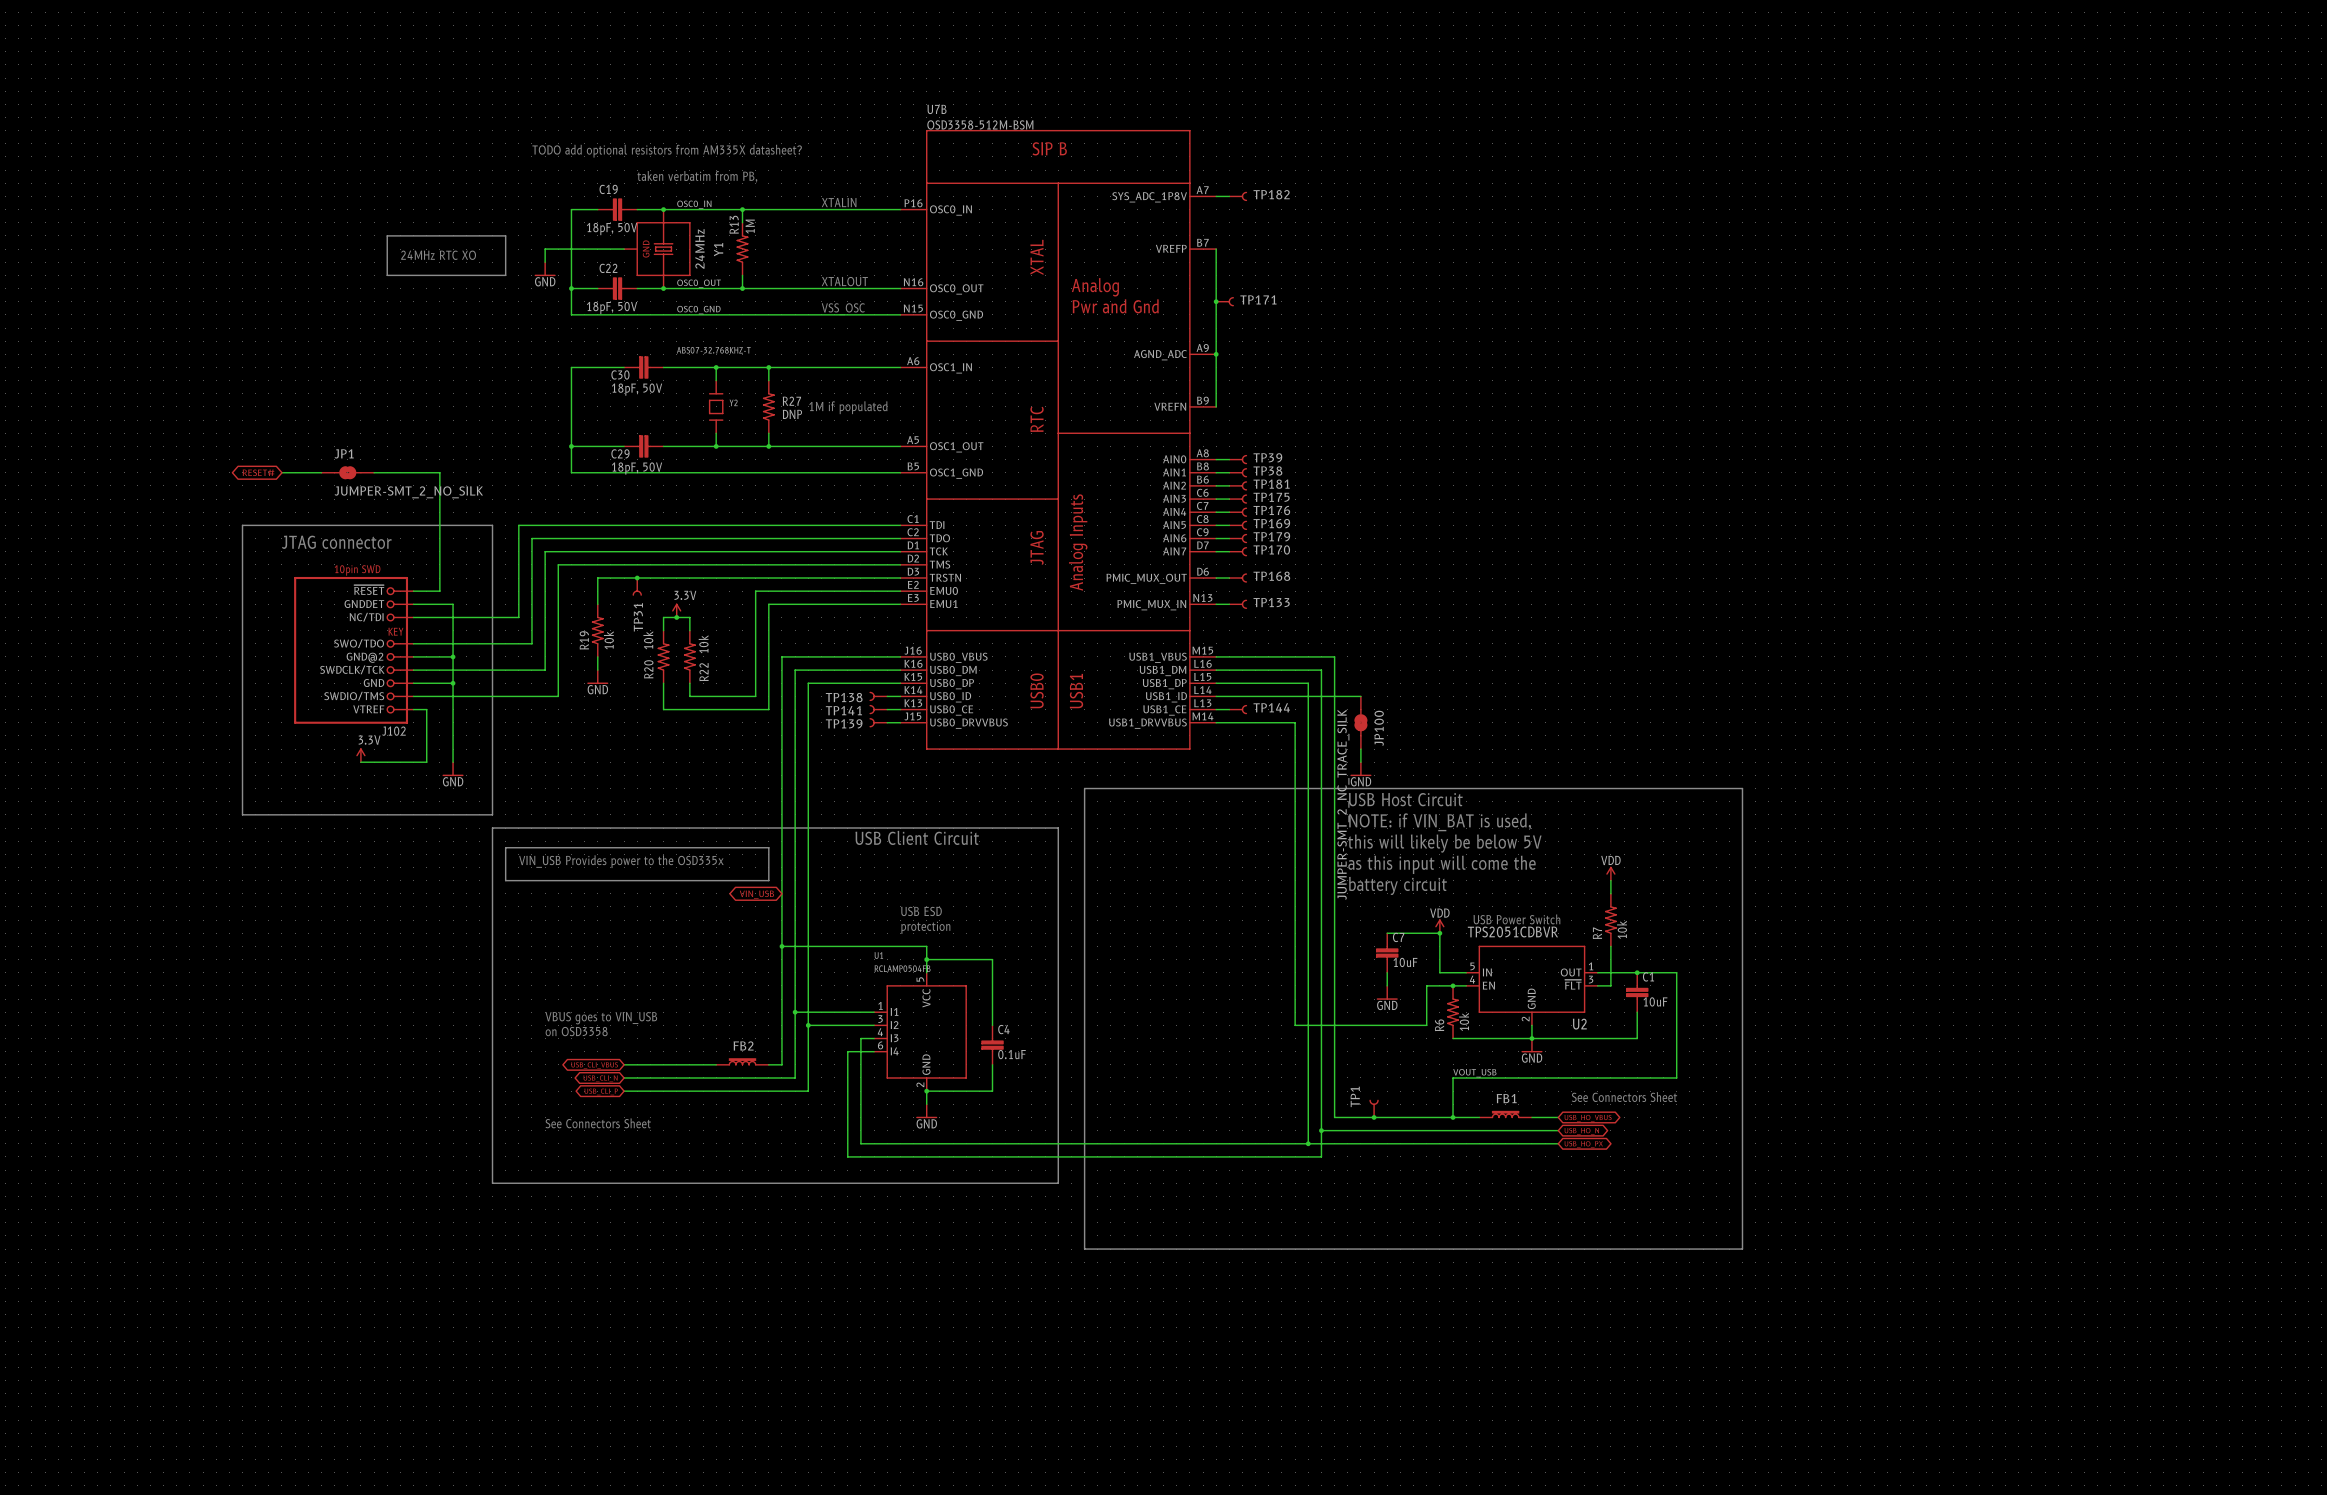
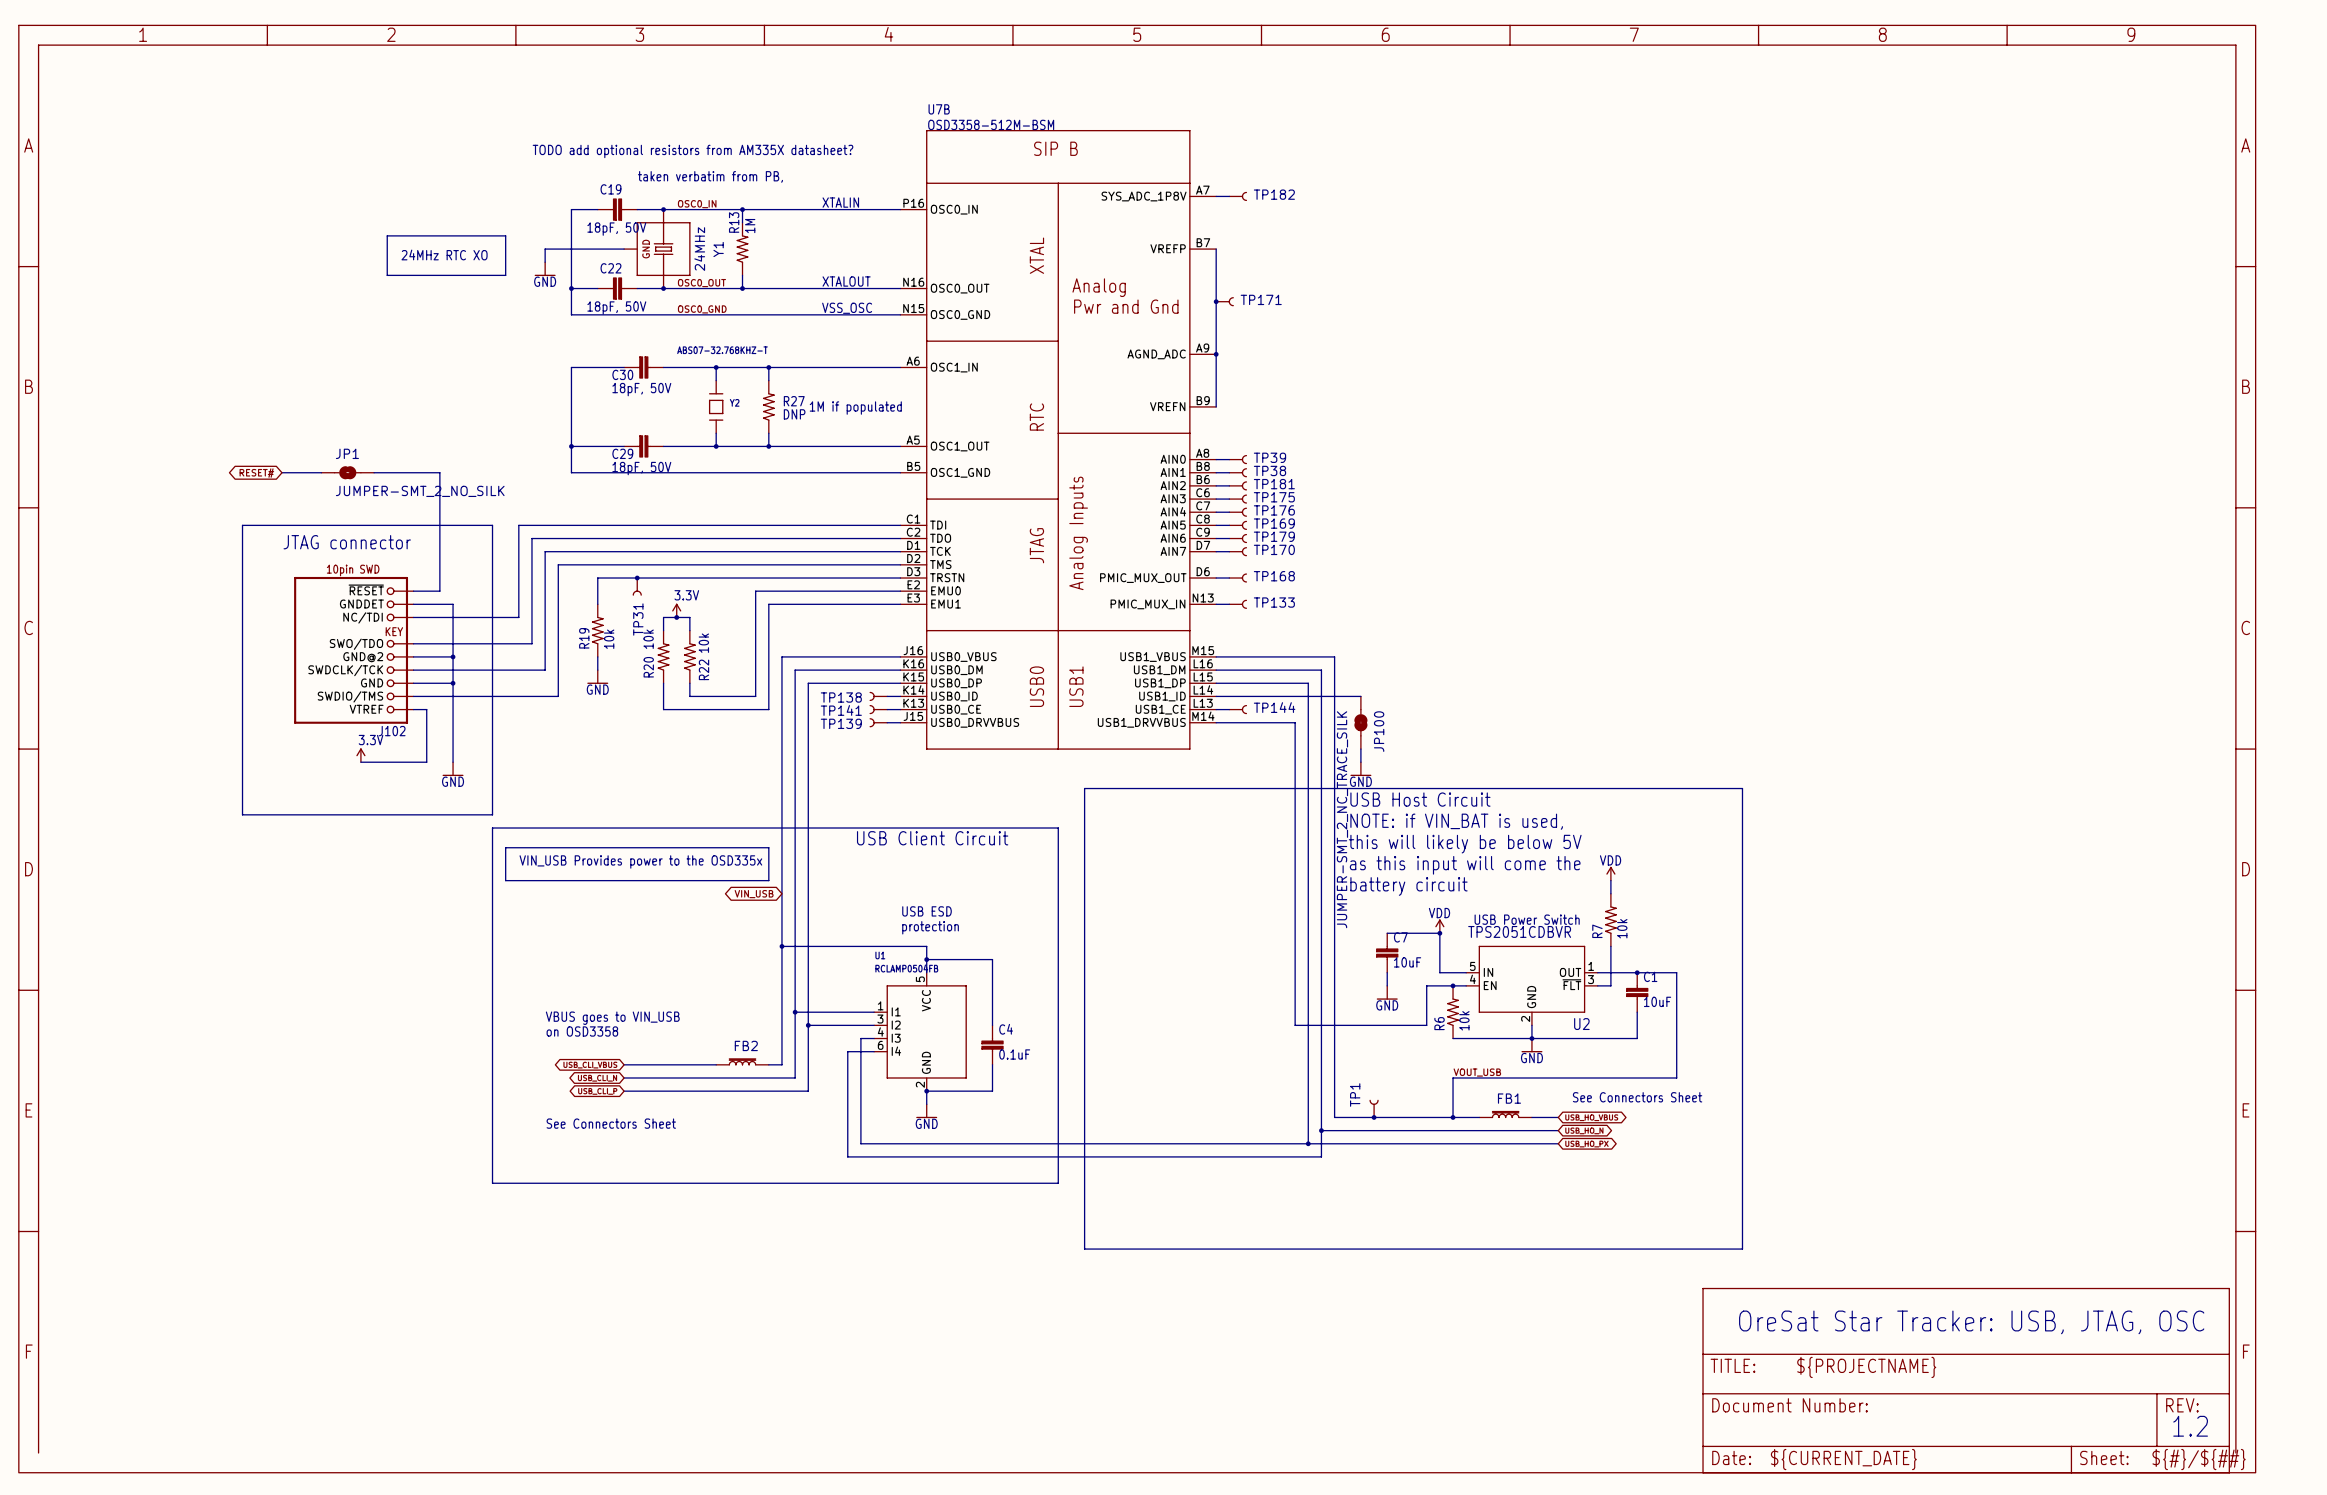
power symbol: none -> (1137, 749)
text: none -> OreSat Star Tracker: USB, JTAG, OSC (1971, 1322)
power symbol: none -> (1966, 1380)
text: none -> 1.2 (2190, 1426)

